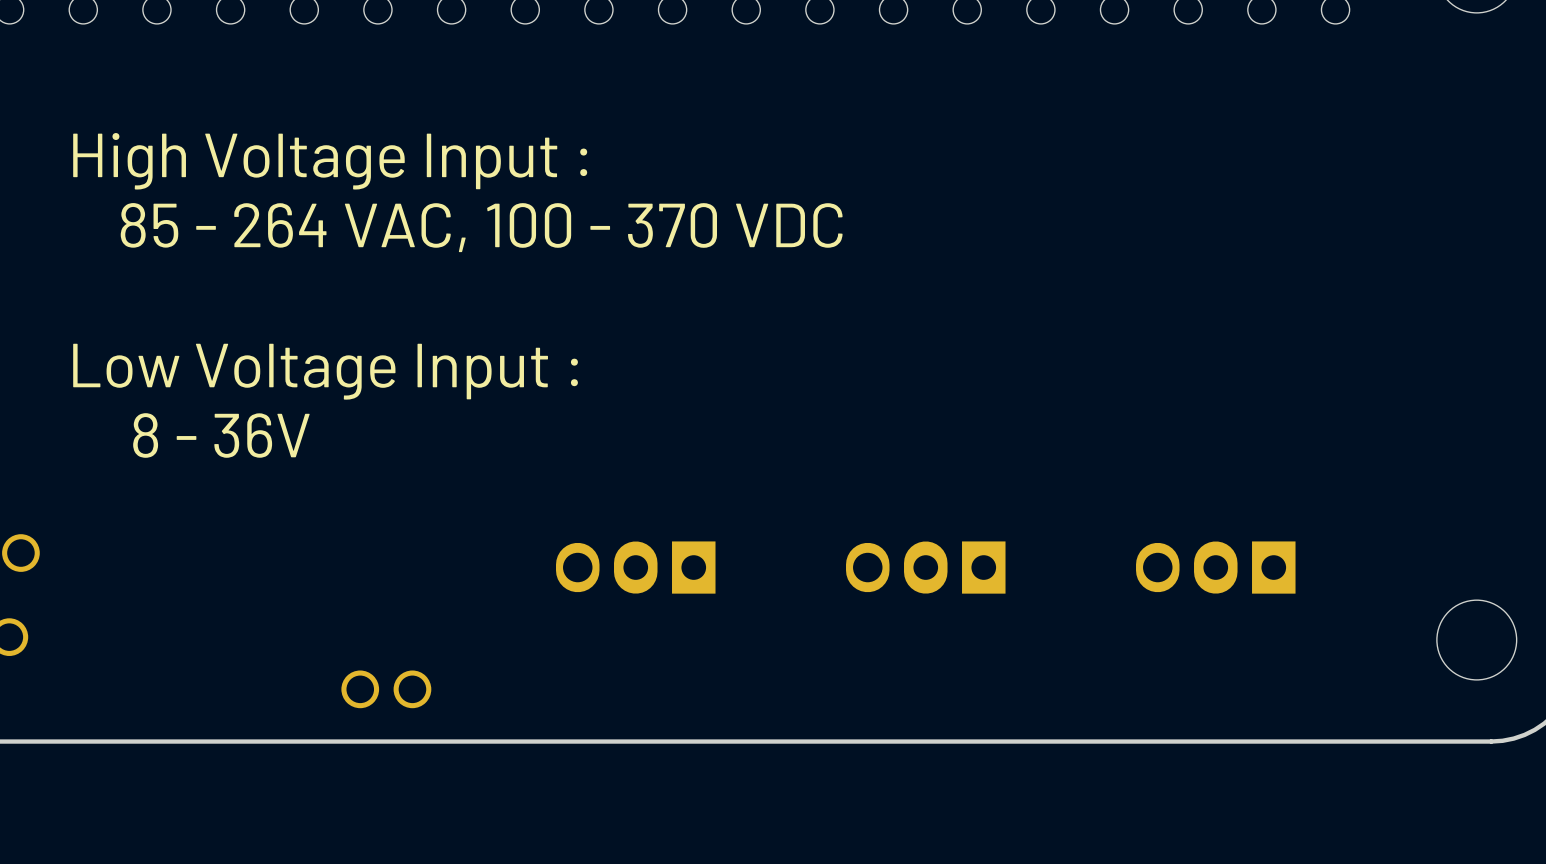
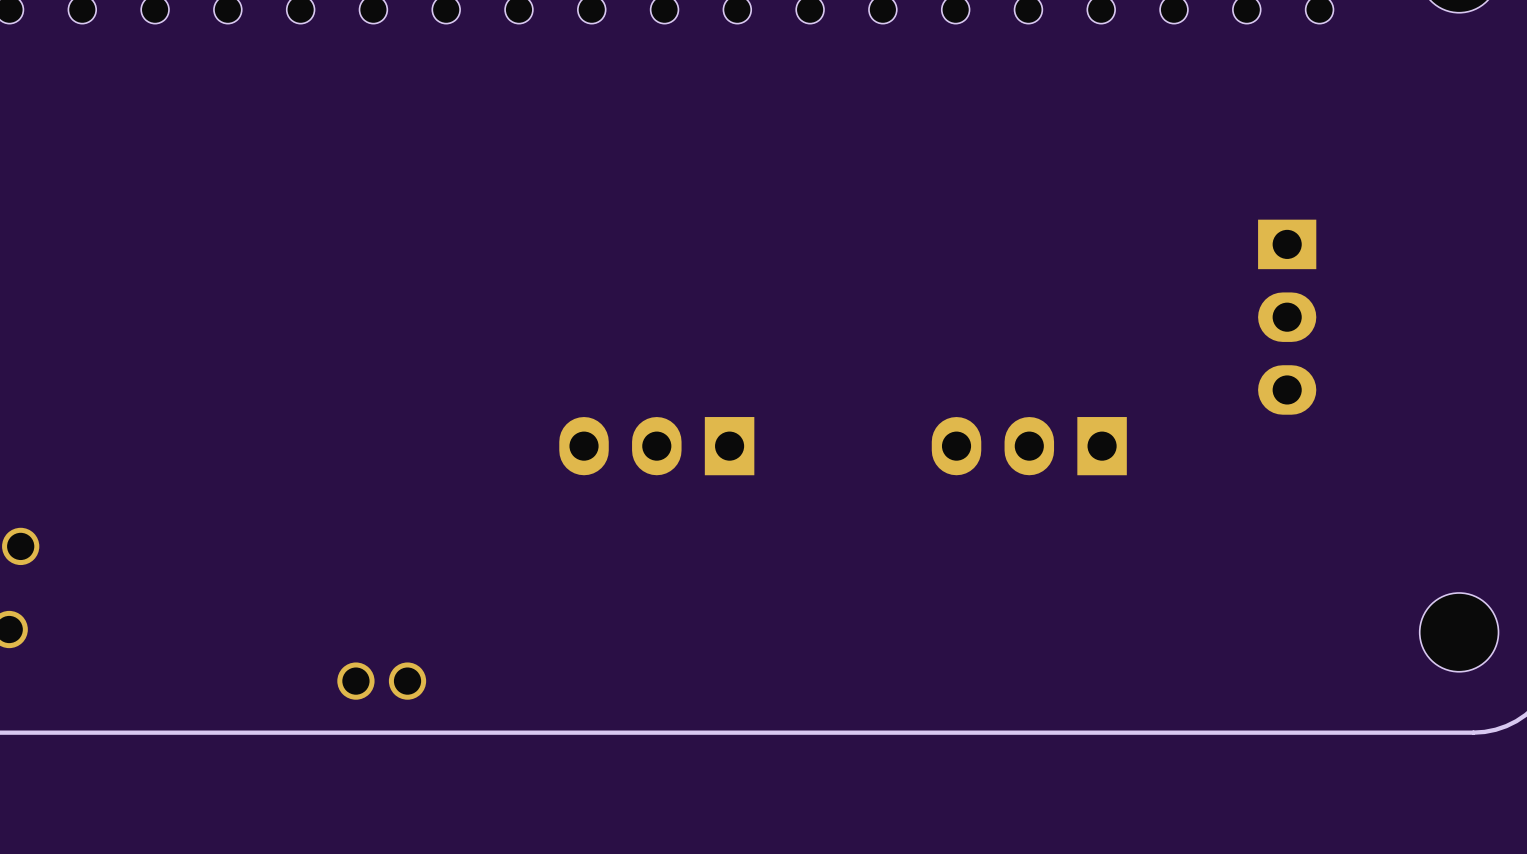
text: High Voltage Input : (330, 161) -> none
text: 85 - 264 VAC, 100 - 370 VDC (481, 227) -> none
part: none -> (1287, 317)
text: Low Voltage Input : (325, 371) -> none
text: 8 - 36V (221, 435) -> none
part: none -> (656, 446)
part: none -> (1029, 446)
part: (635, 567) -> none
part: (925, 567) -> none
part: (1215, 567) -> none

